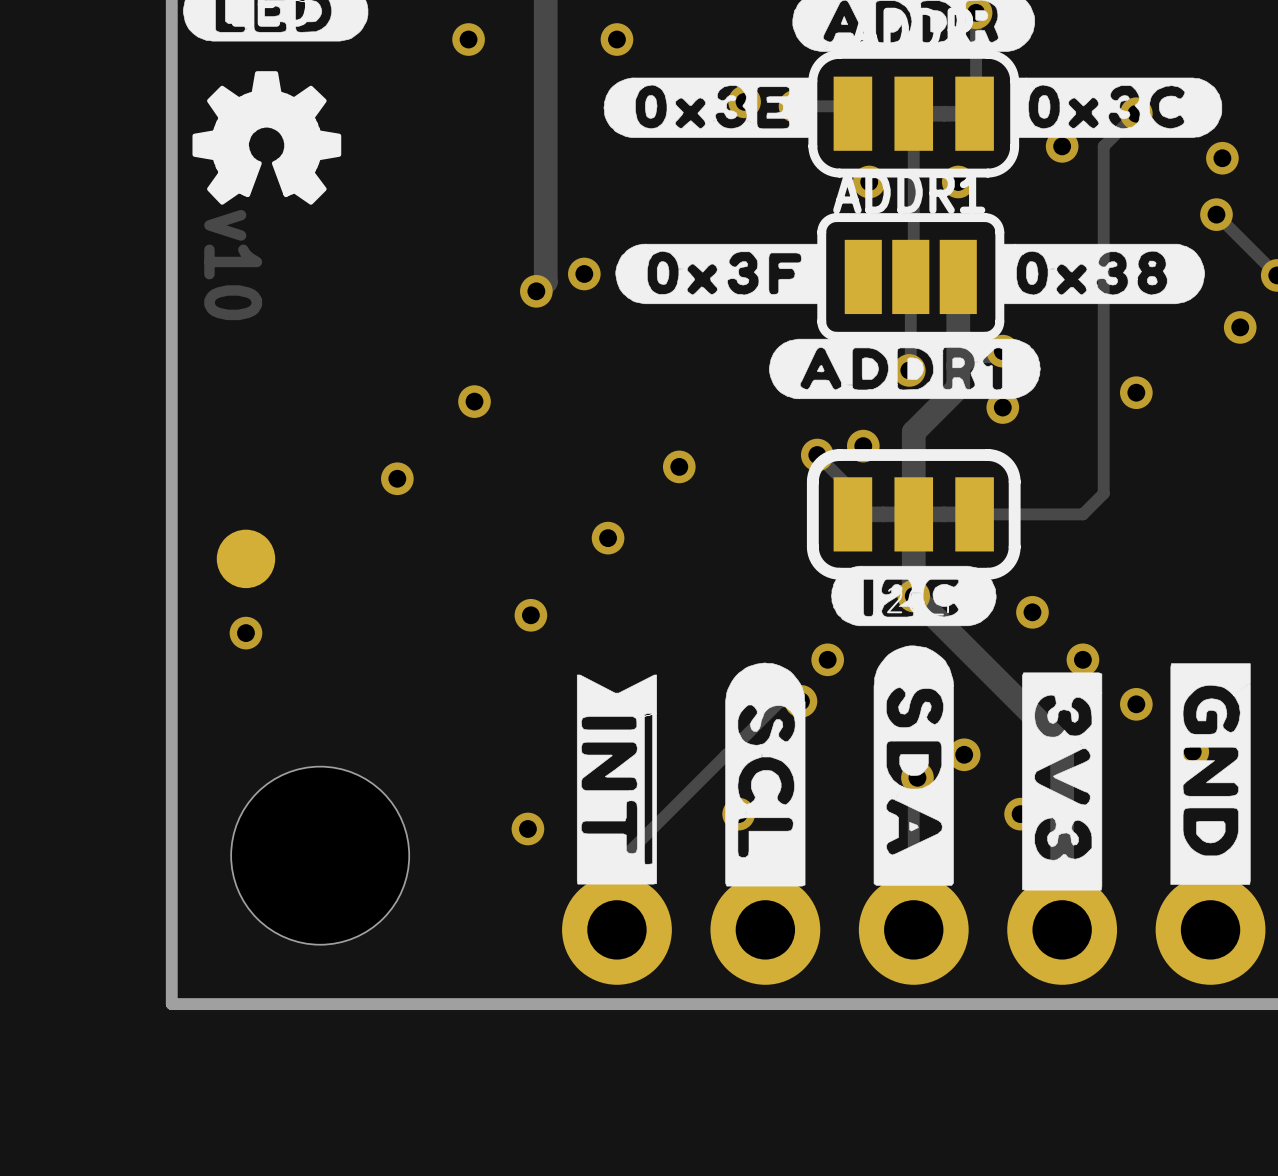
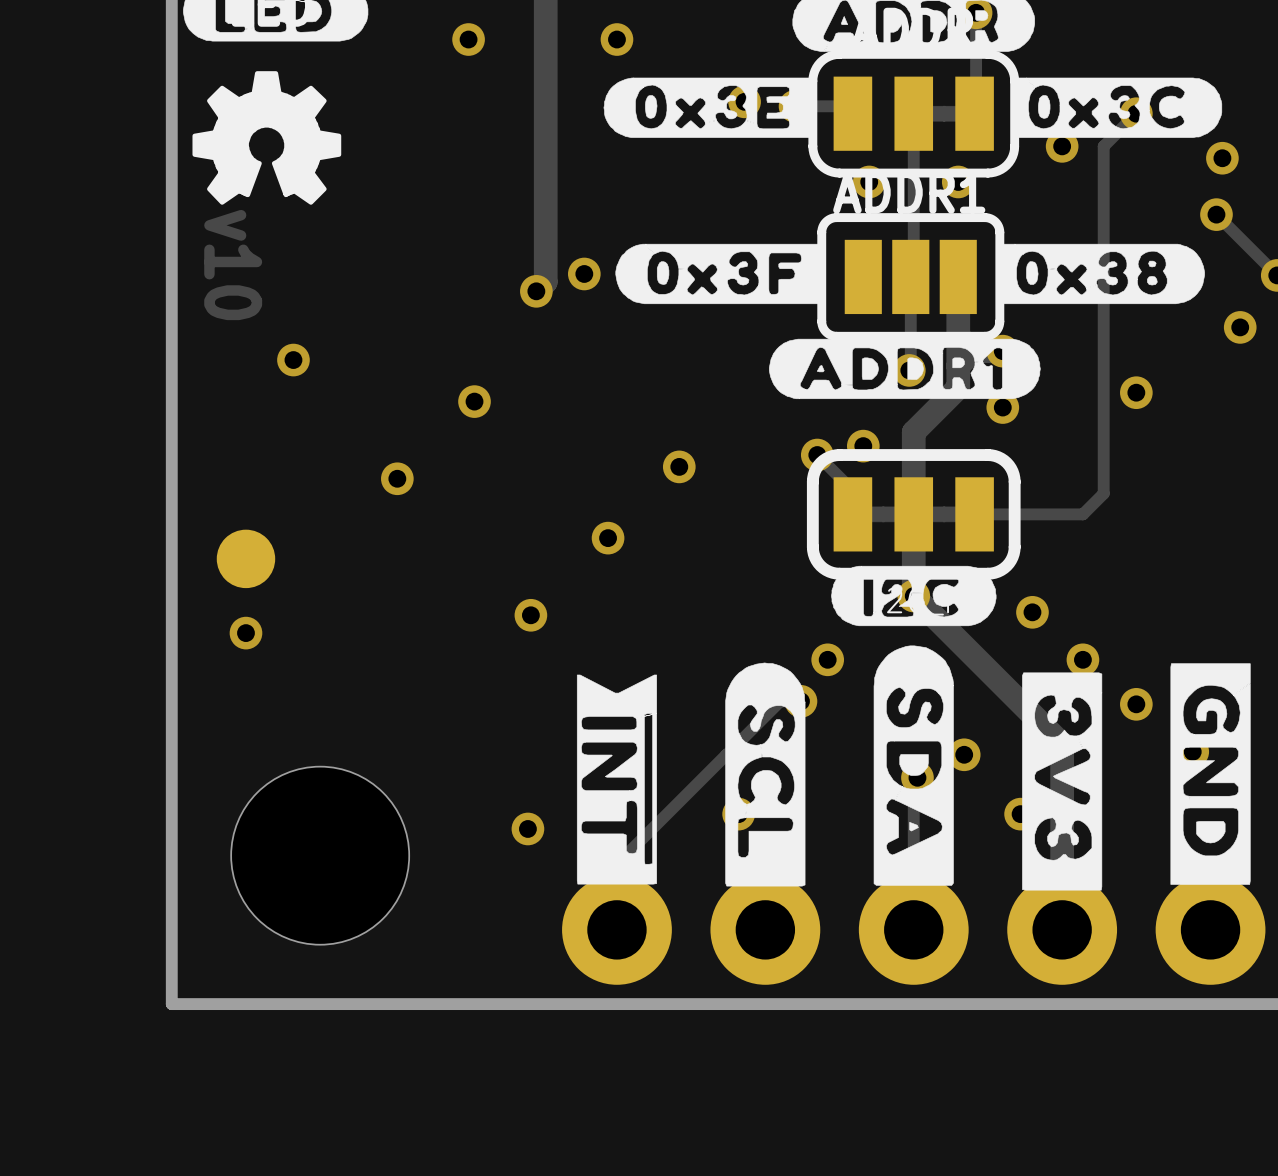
via: none -> (293, 360)

